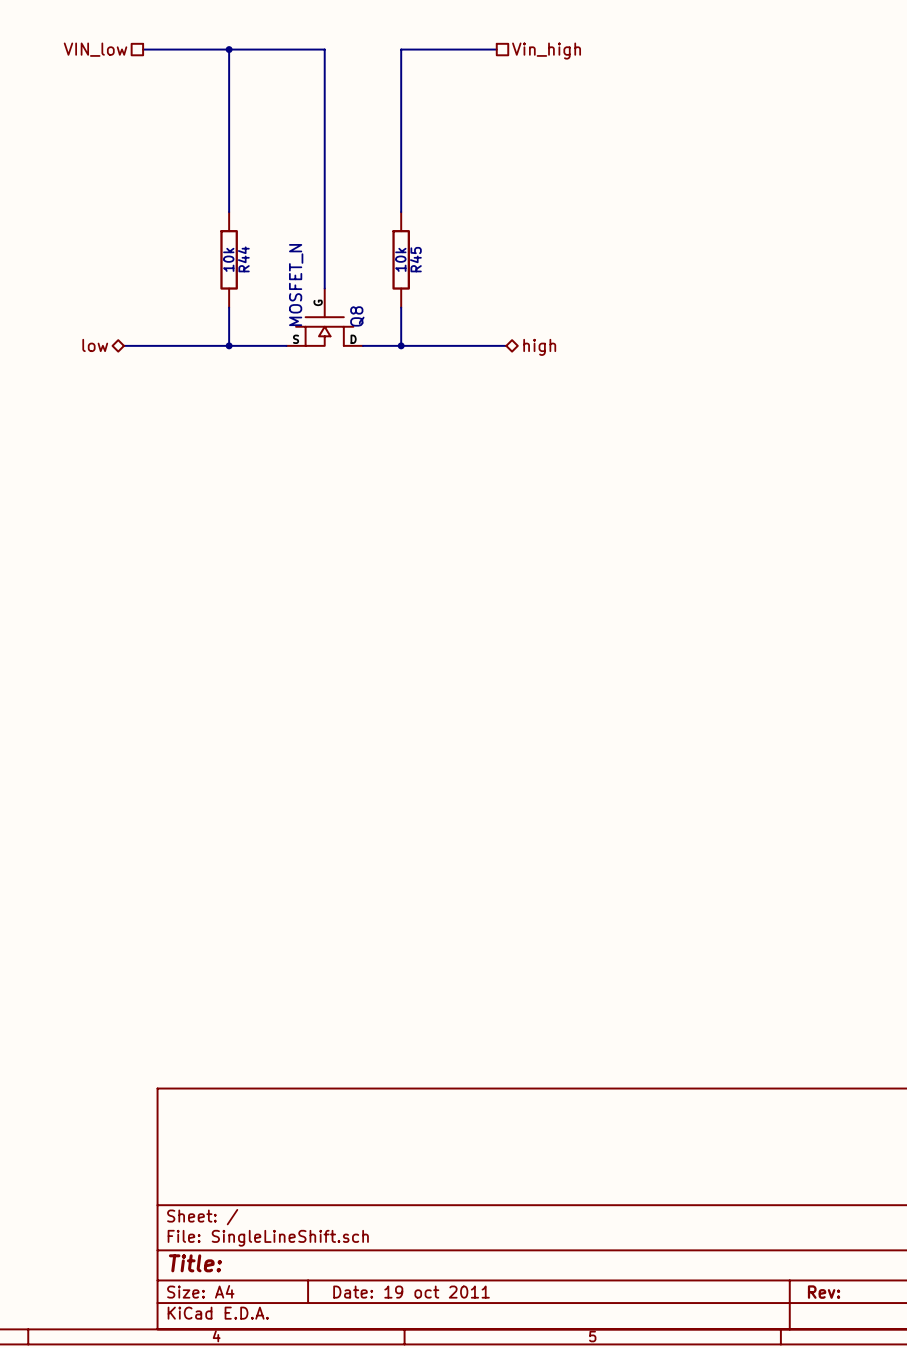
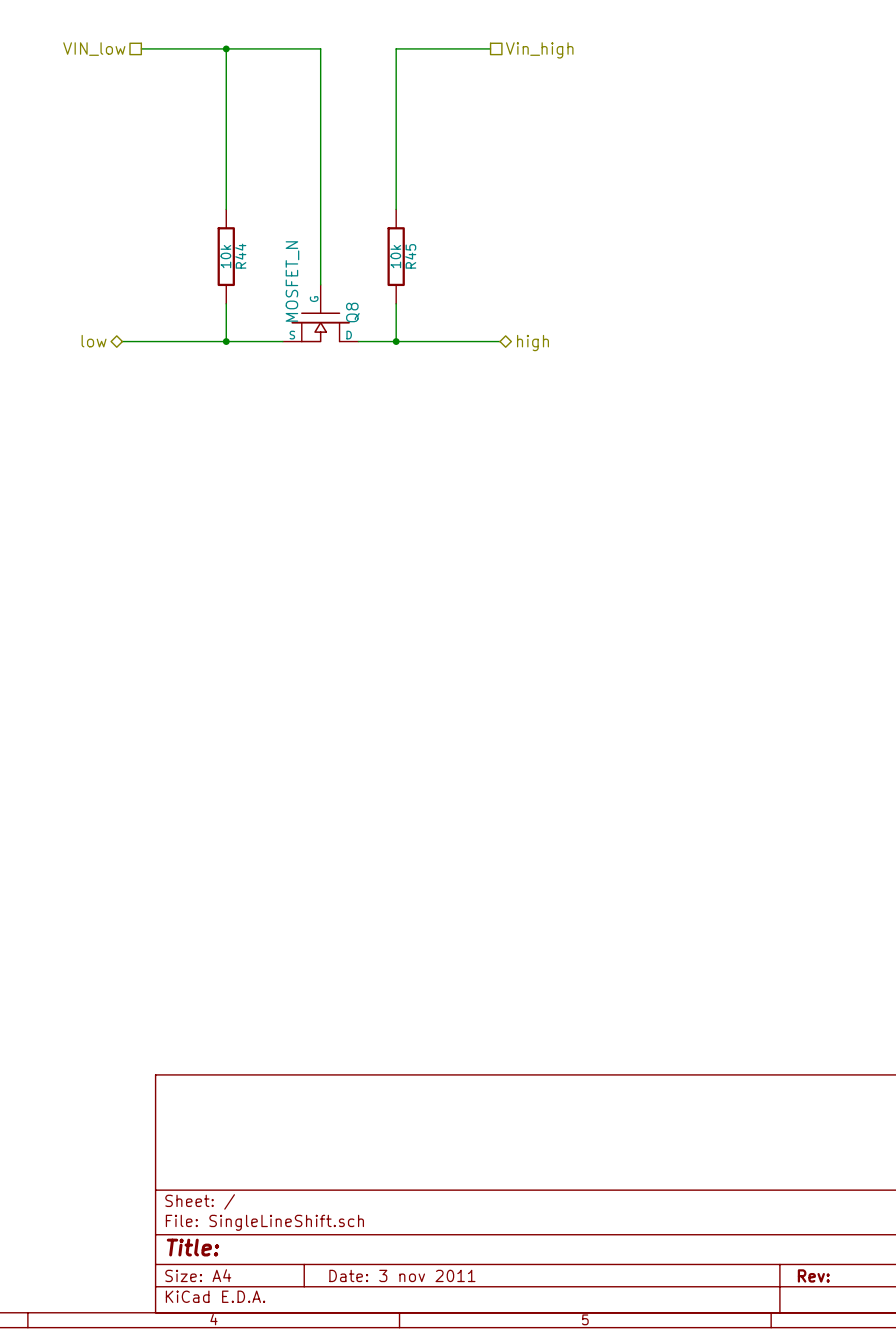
title block: Date: 19 oct 2011 (411, 1292) -> Date: 3 nov 2011 (402, 1275)

